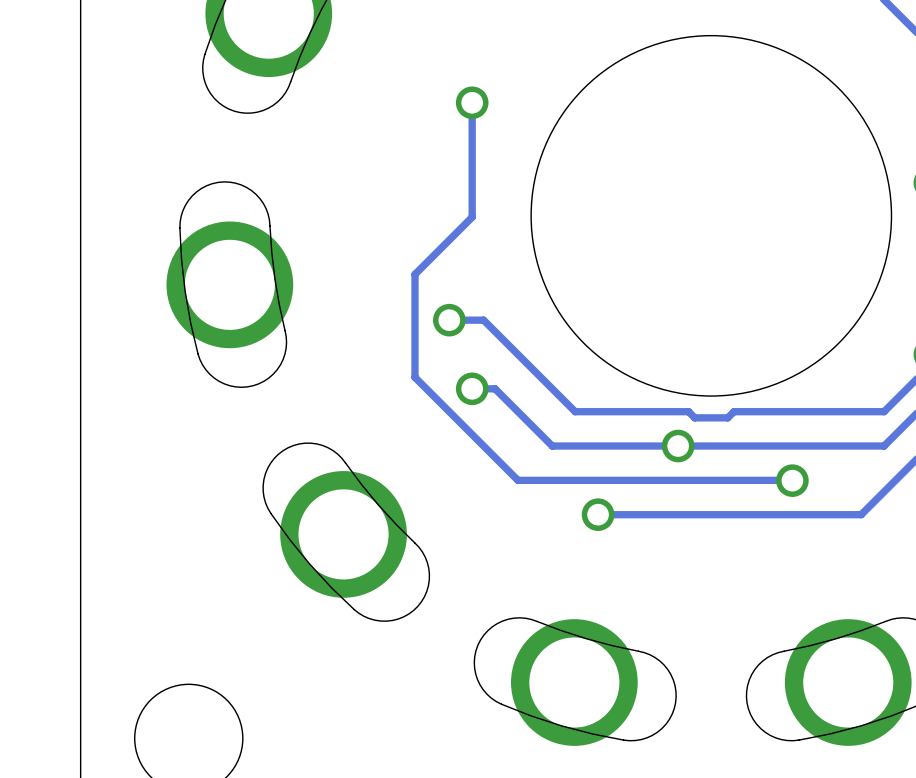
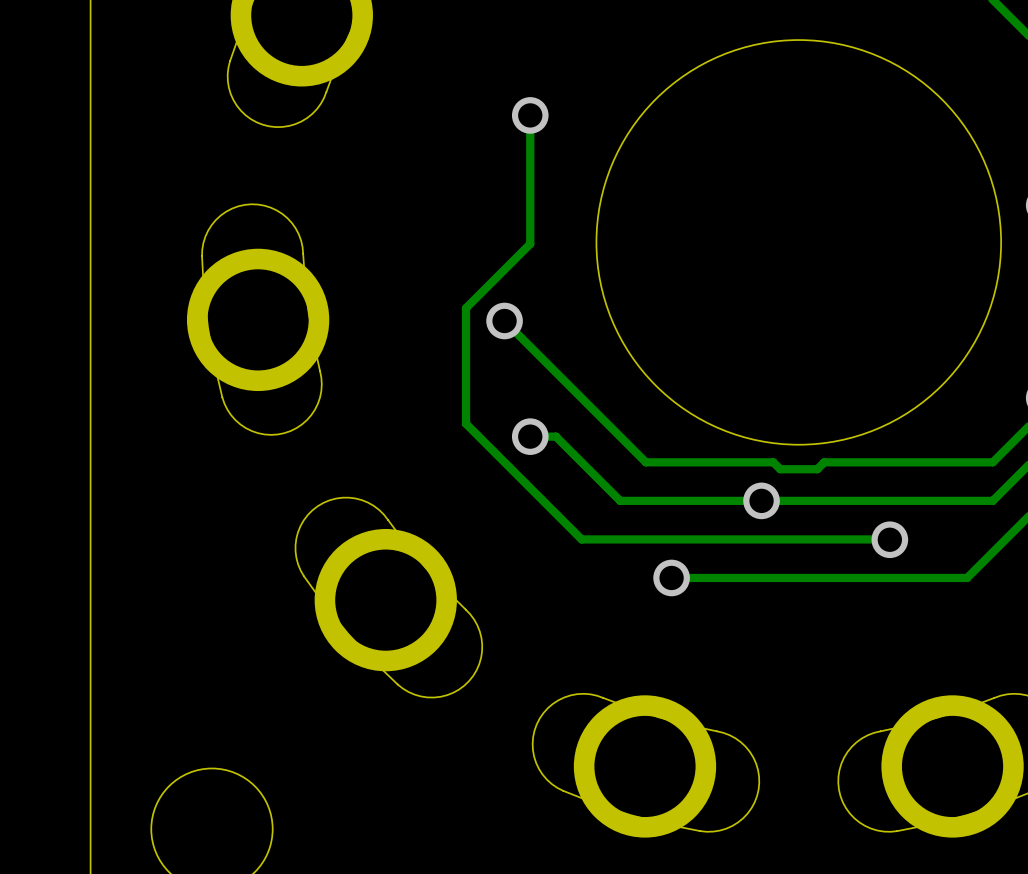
via position: (449, 320) -> (504, 320)
track: (483, 320) (449, 320) -> (543, 359) (504, 320)

